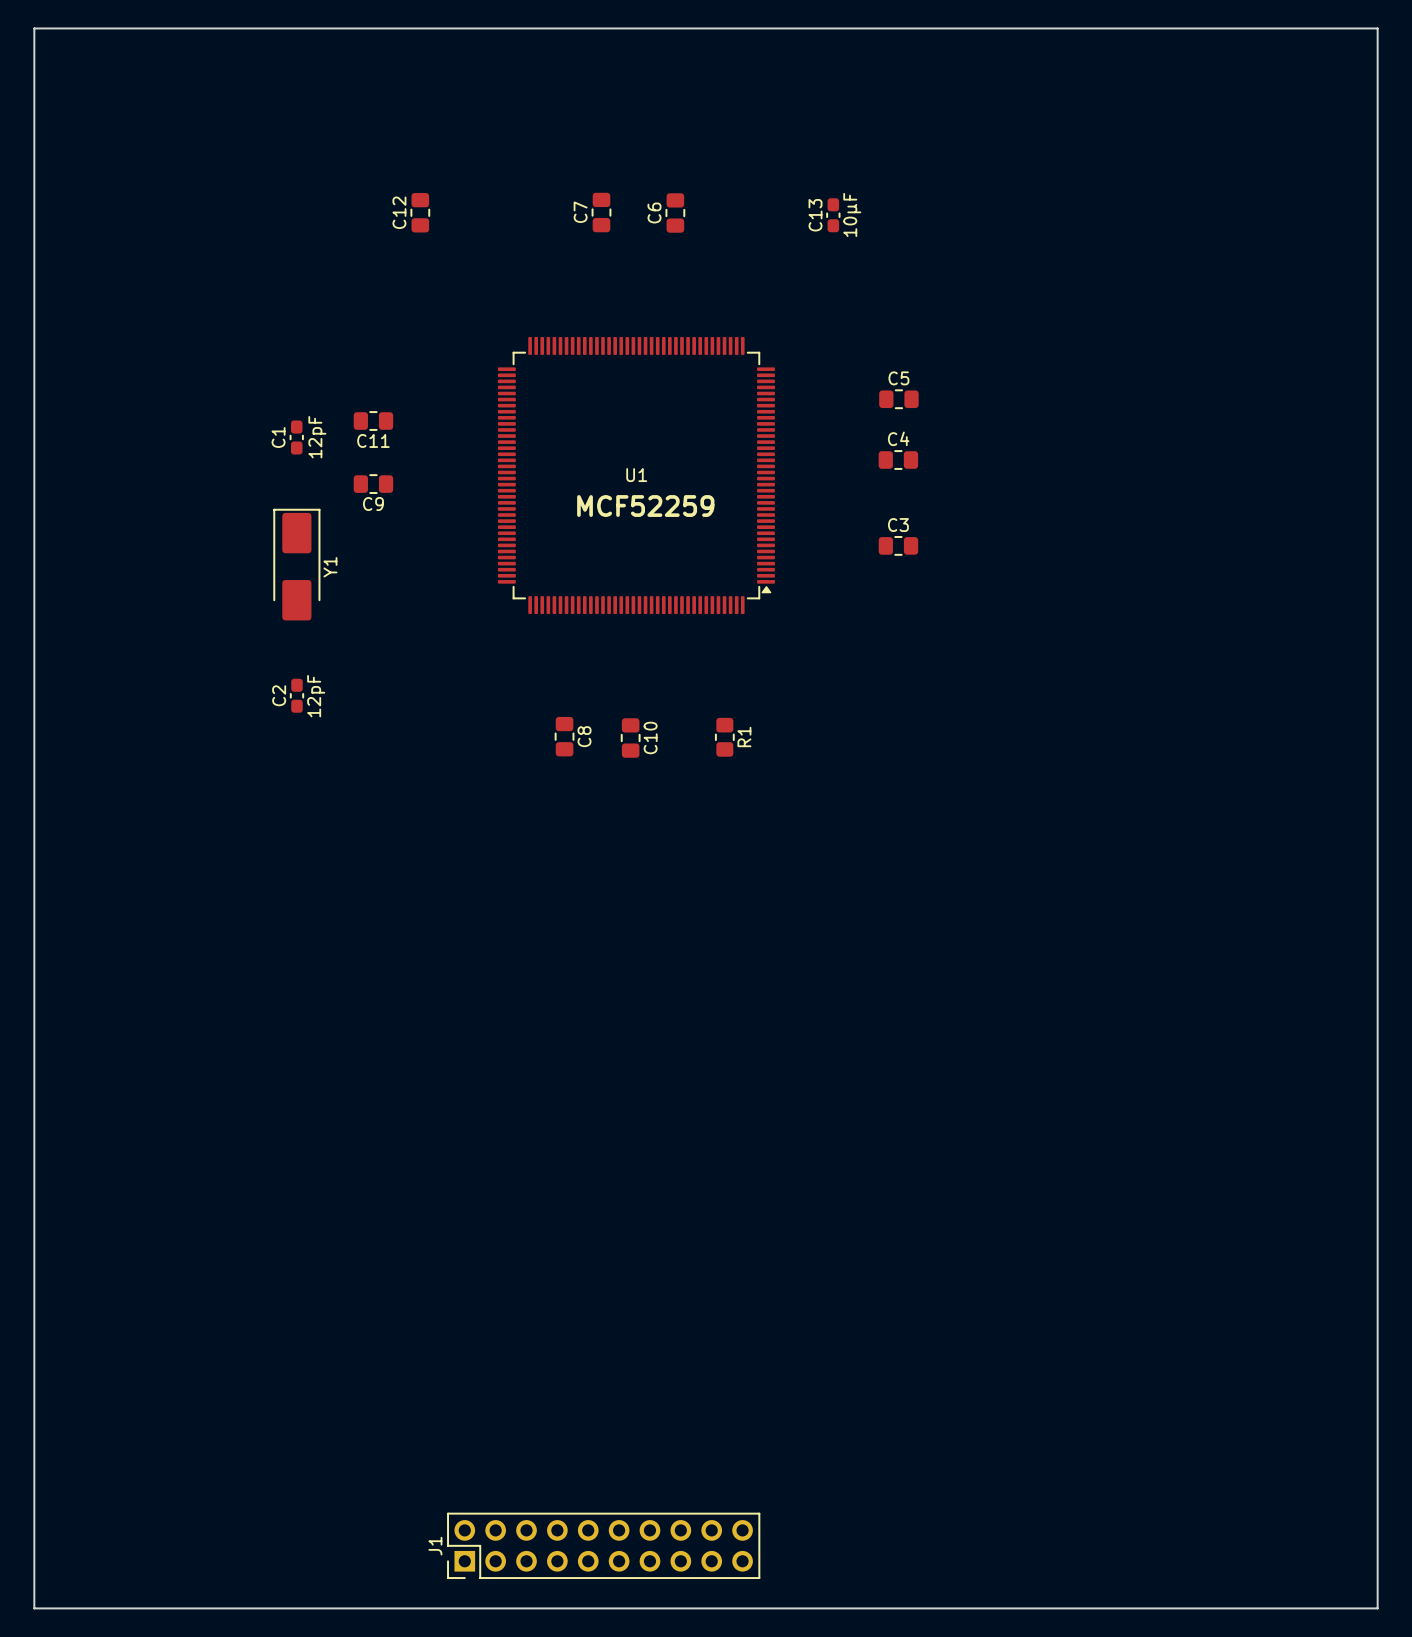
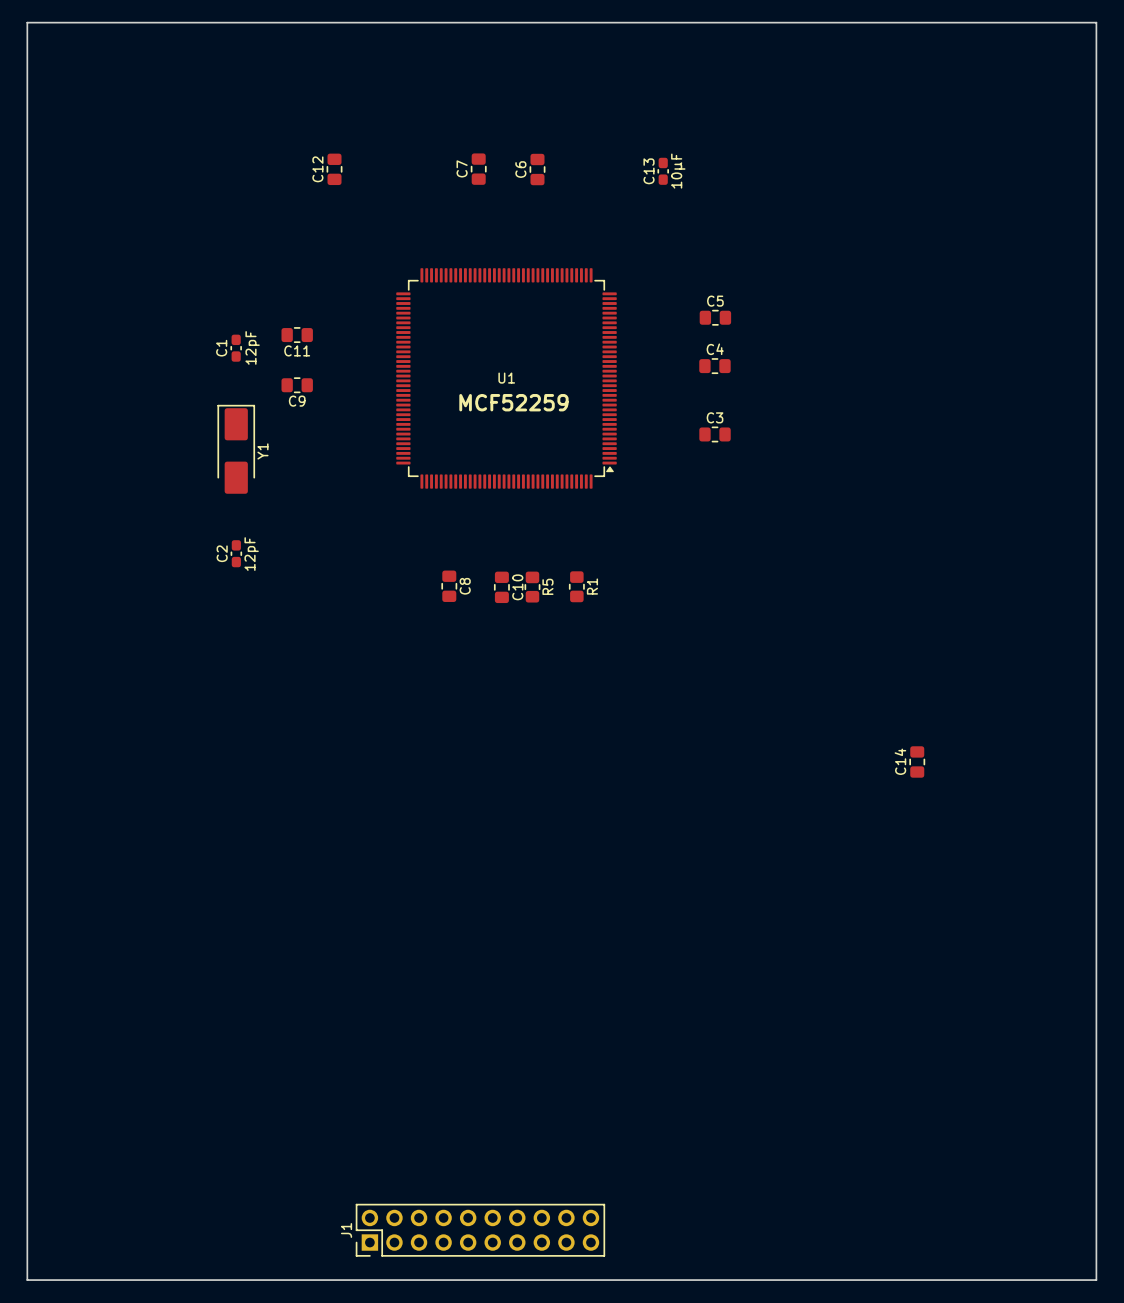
R5: none -> (532, 587)
C14: none -> (917, 761)

